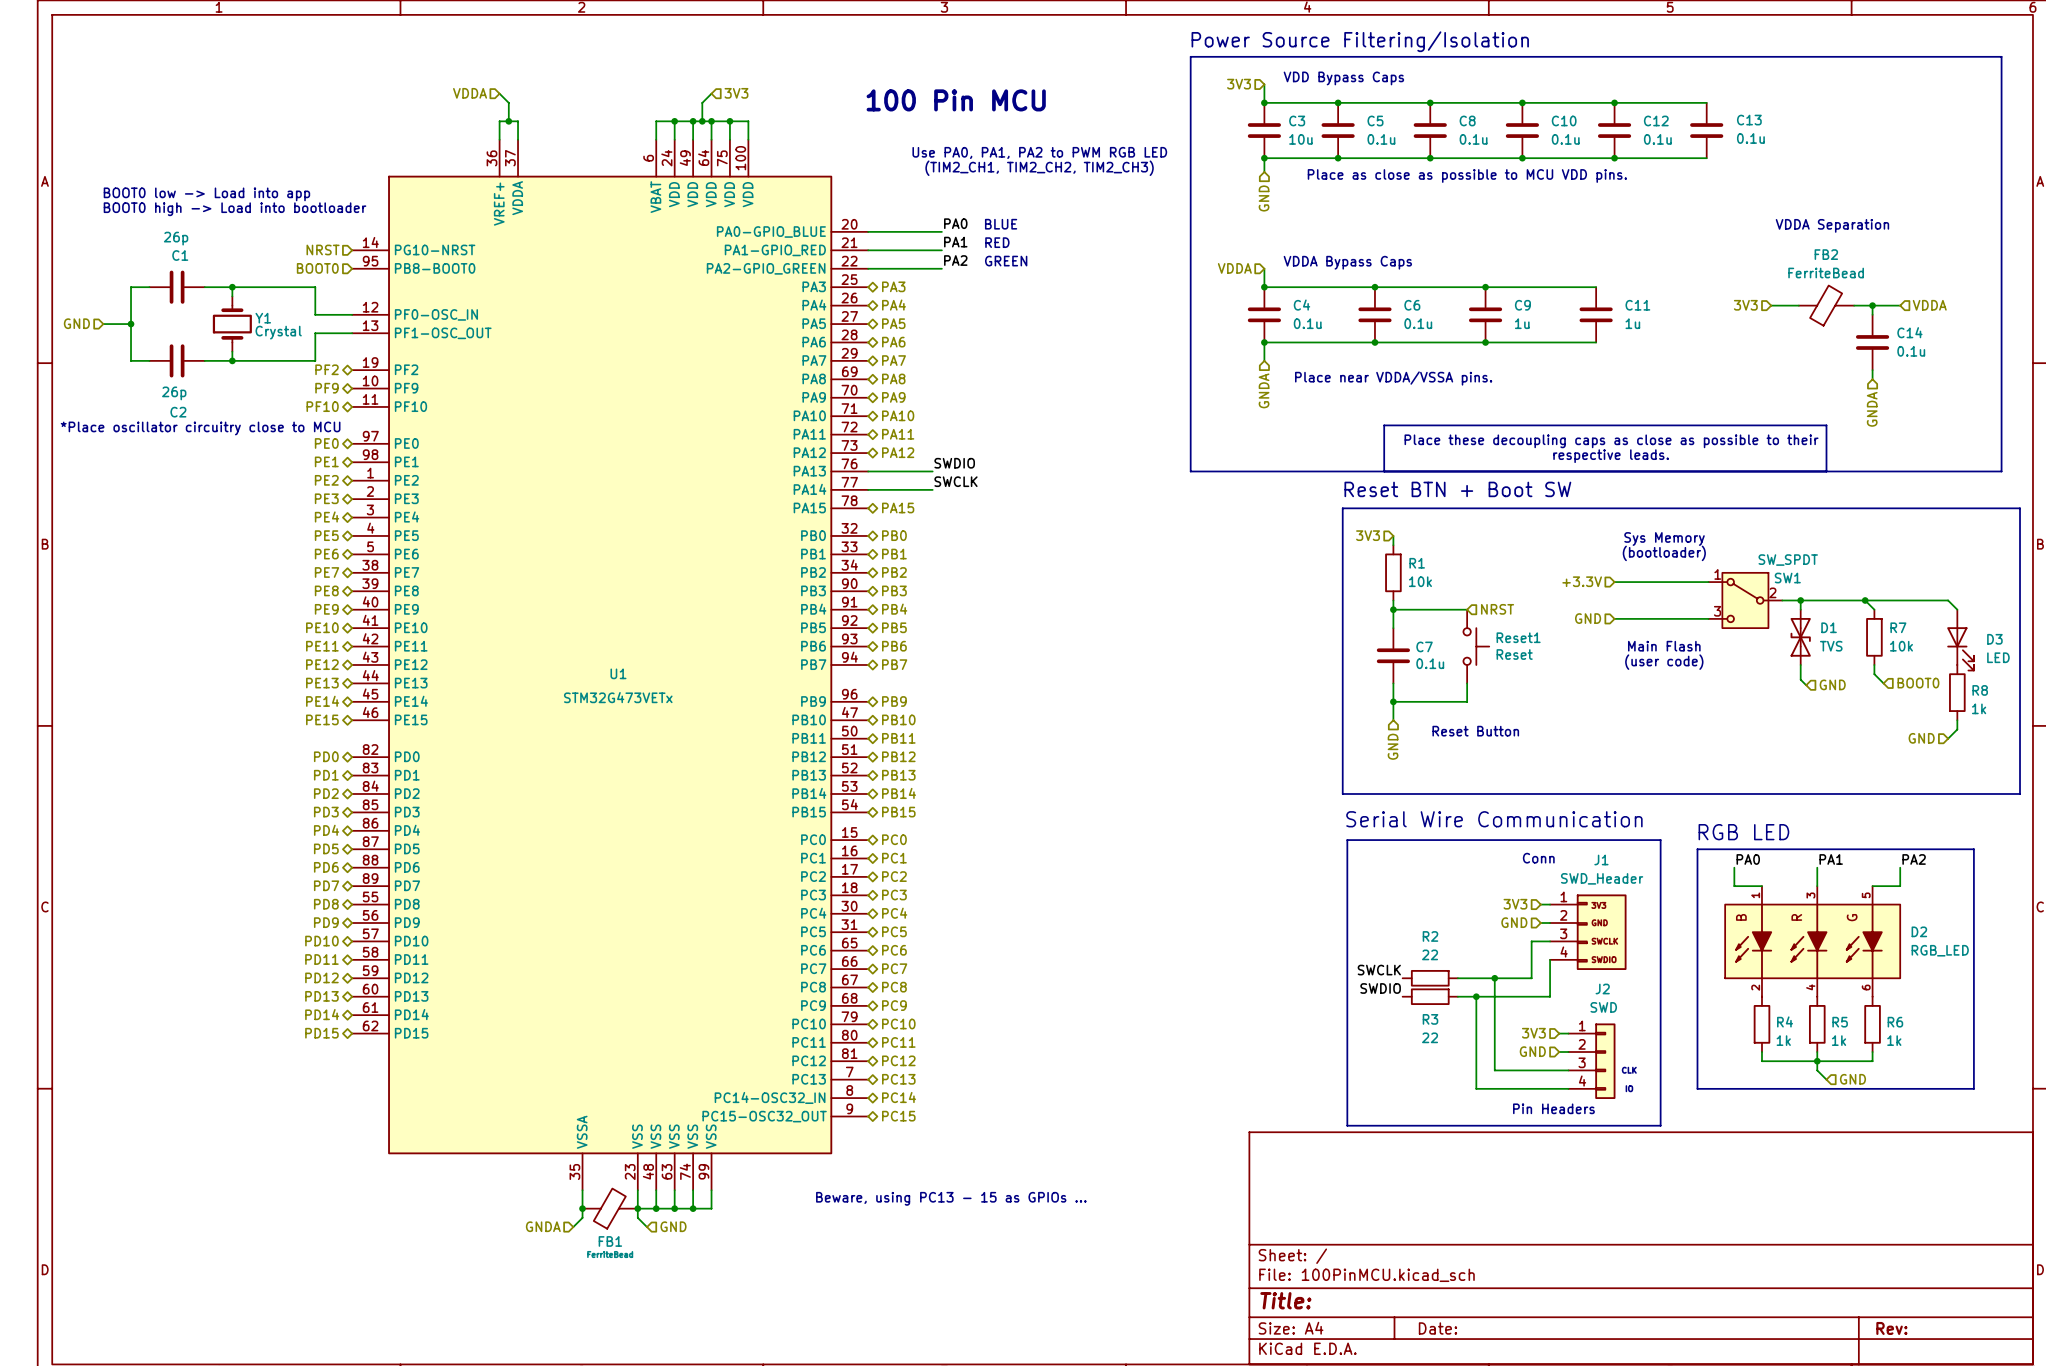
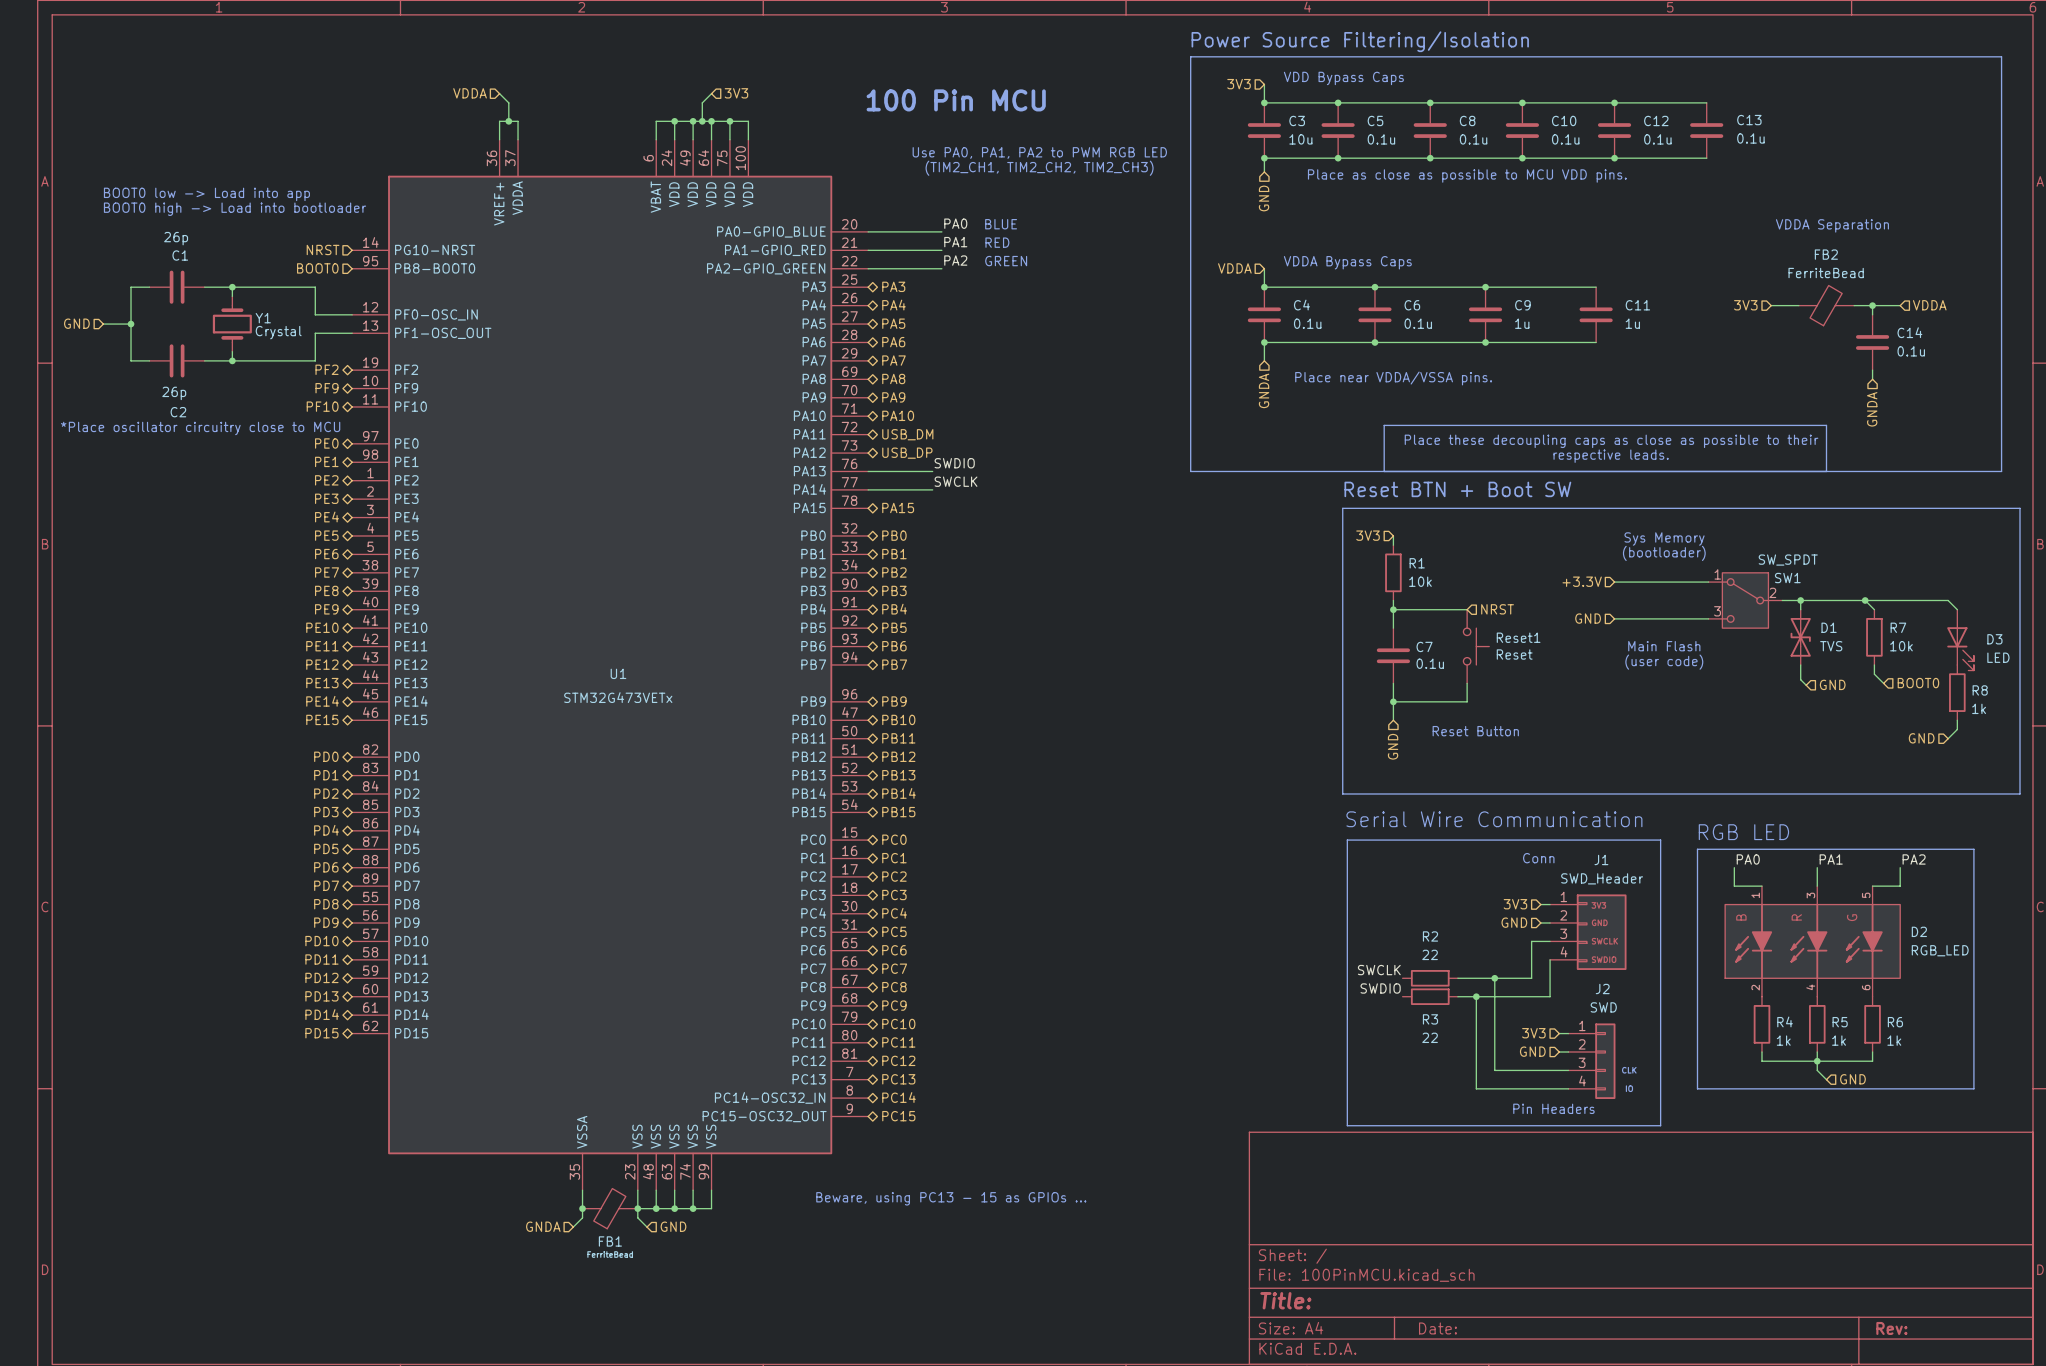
hierarchical label: PA11 (898, 434) -> USB_DM (907, 434)
hierarchical label: PA12 (898, 452) -> USB_DP (907, 453)

